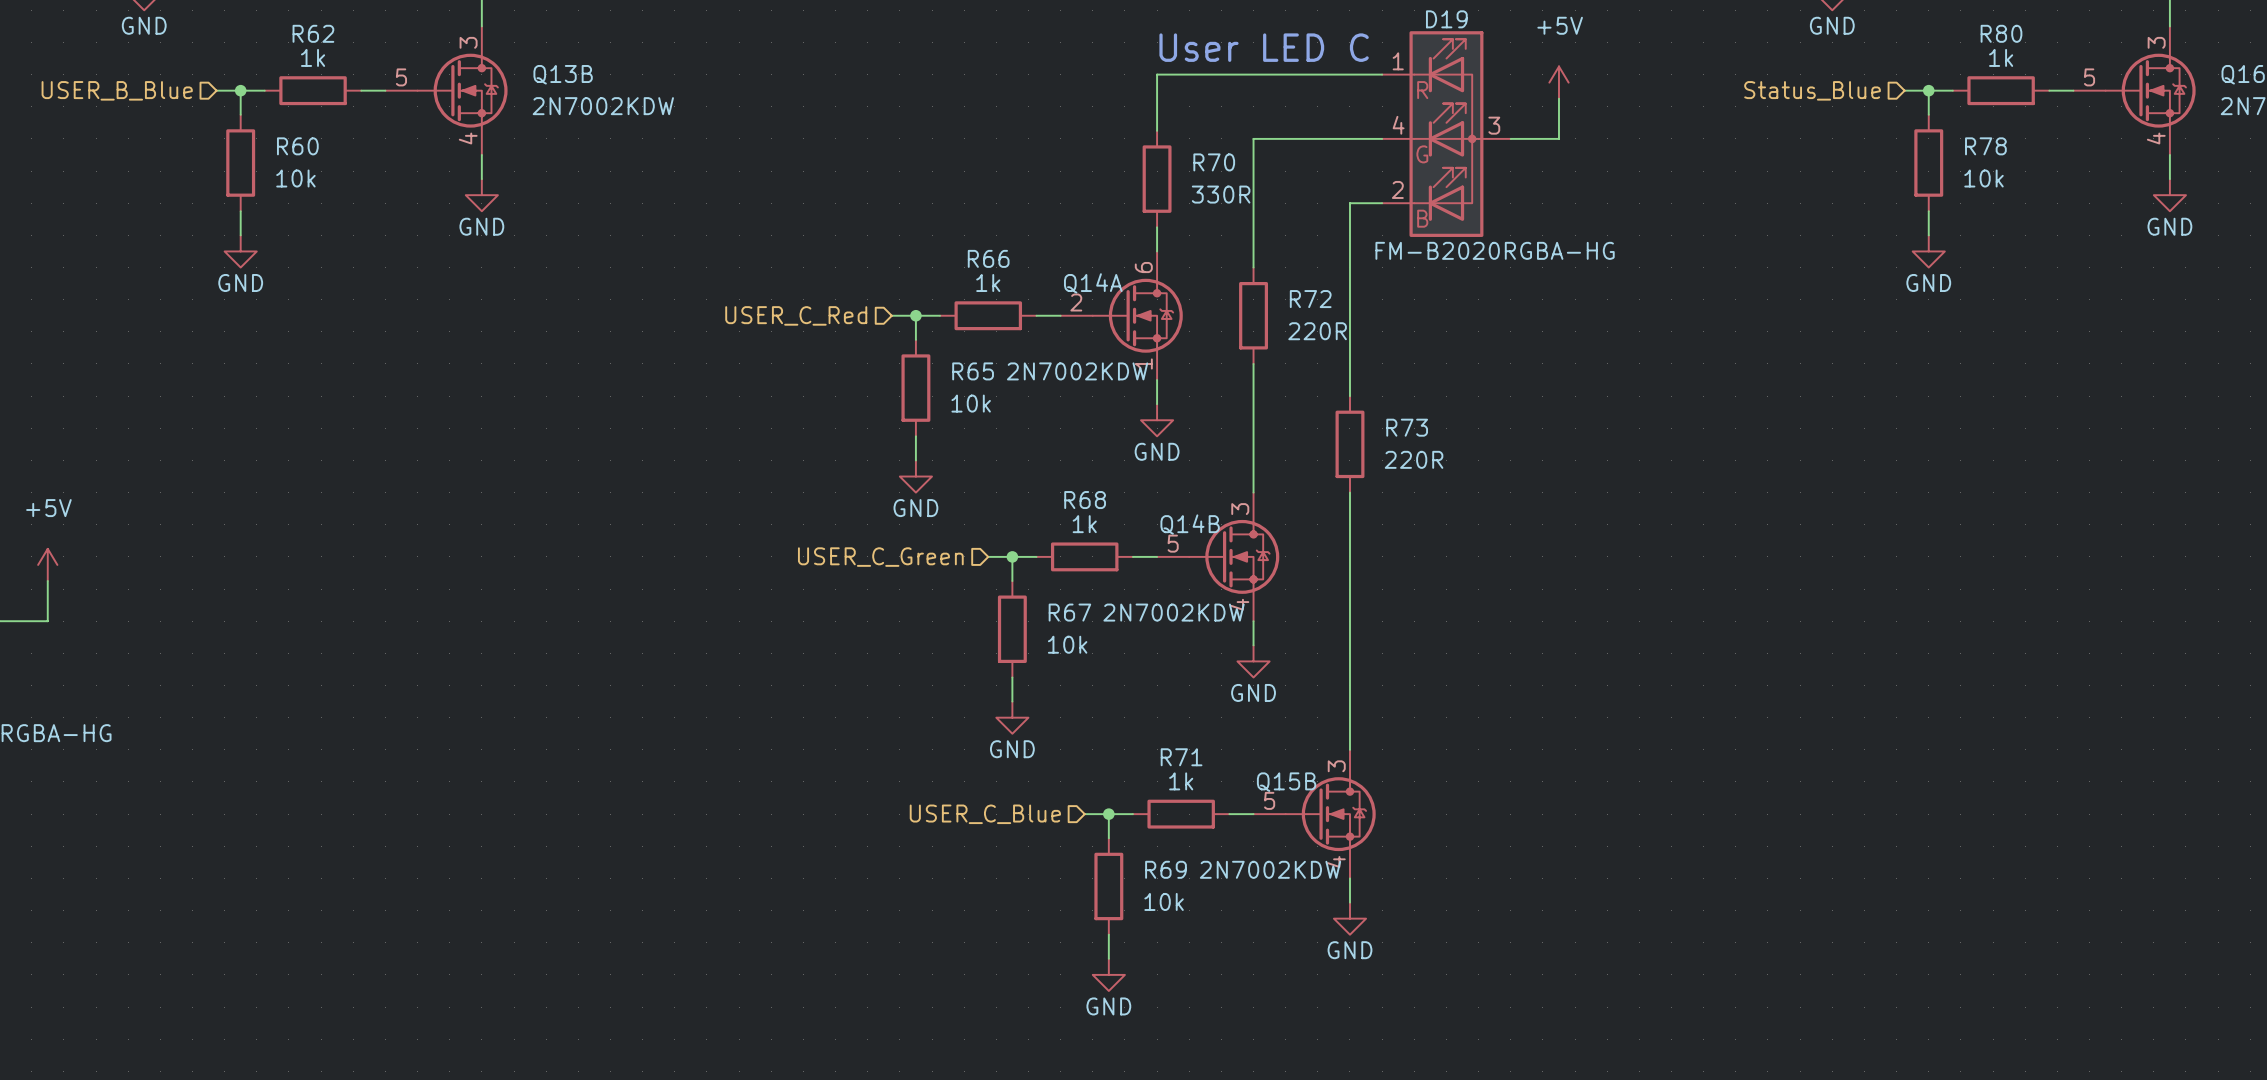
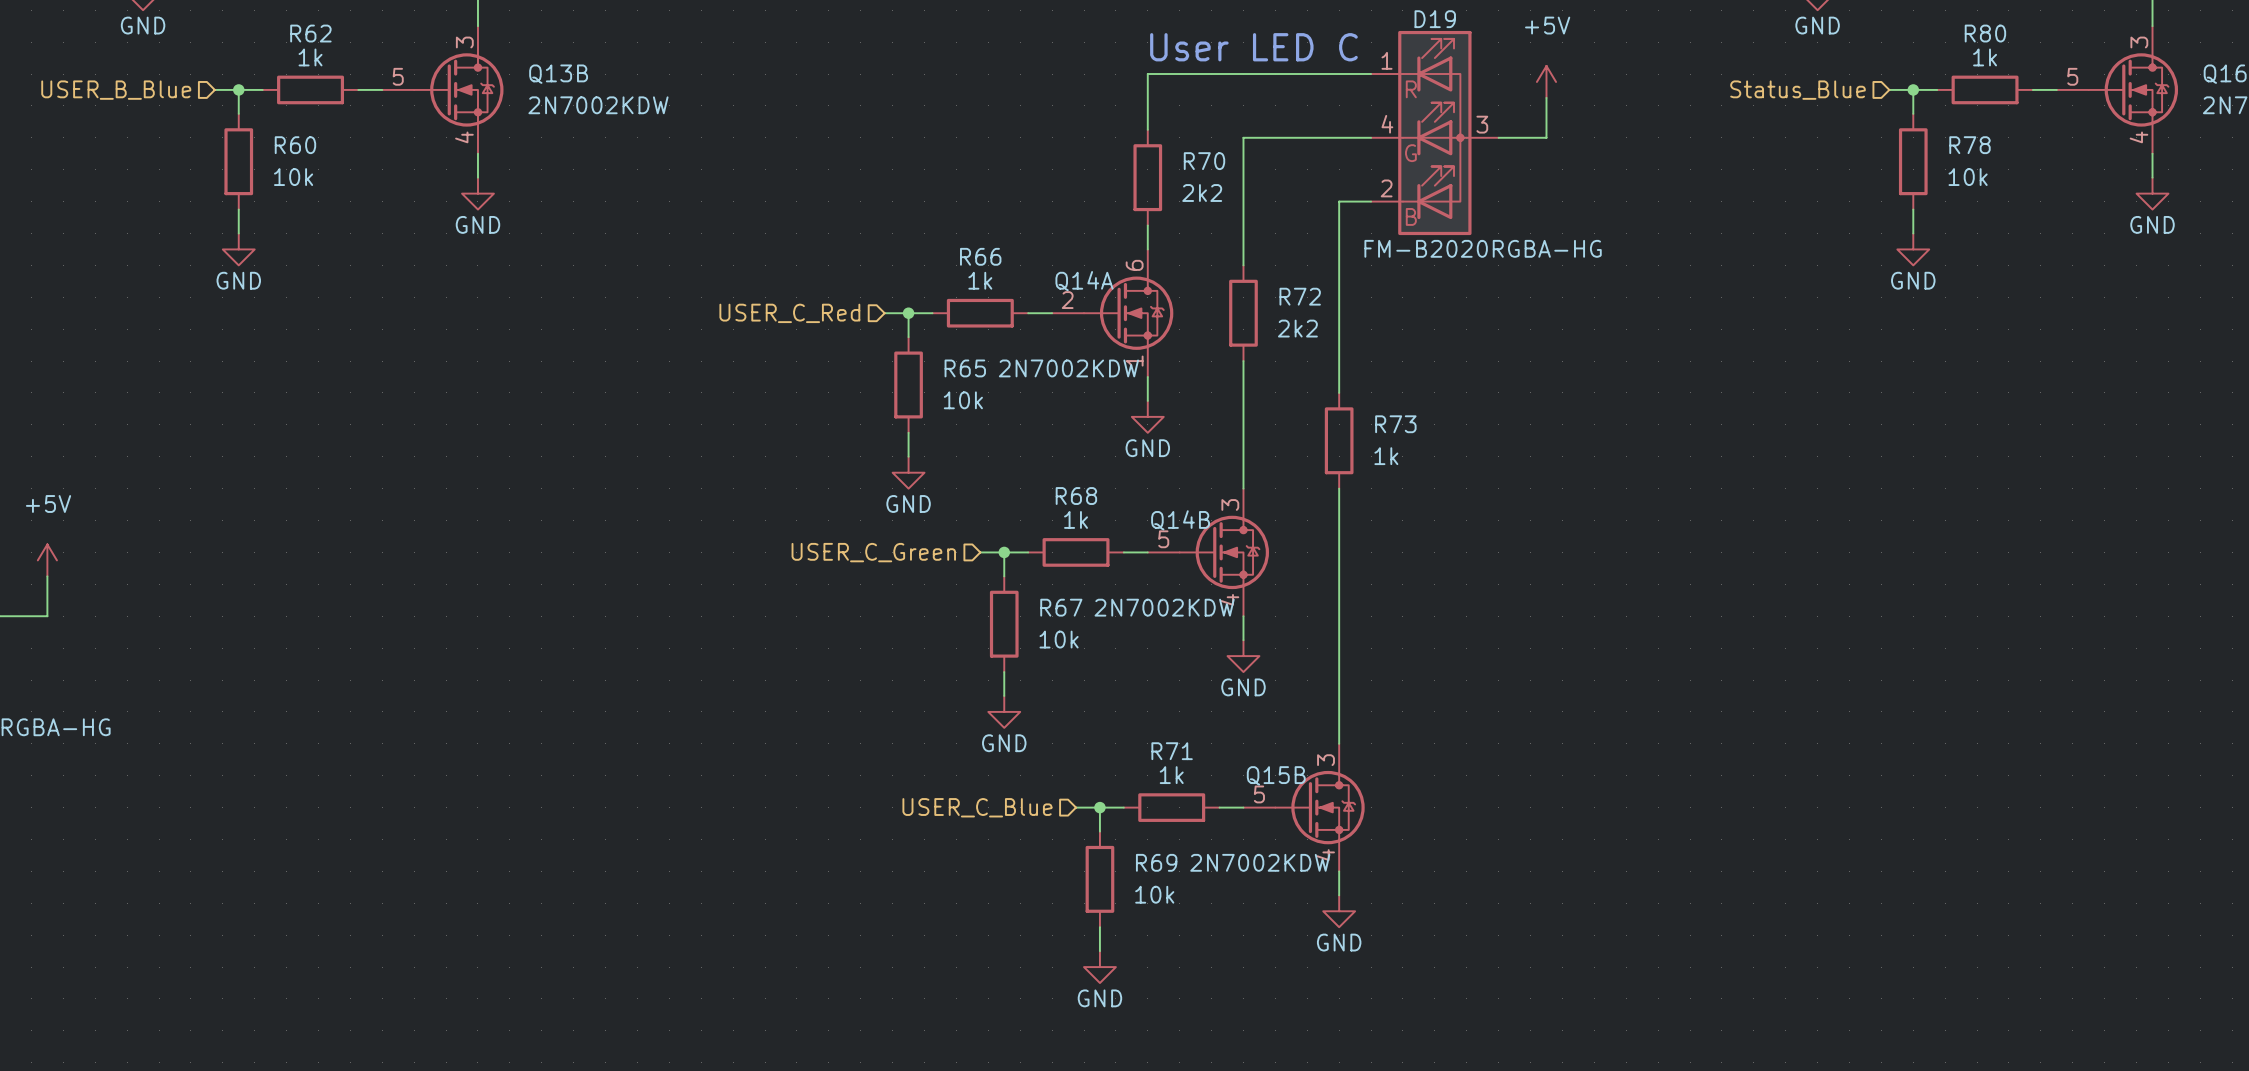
R70 value: 330R (1221, 194) -> 2k2 (1202, 193)
R72 value: 220R (1317, 331) -> 2k2 (1297, 328)
R73 value: 220R (1414, 459) -> 1k (1386, 456)

